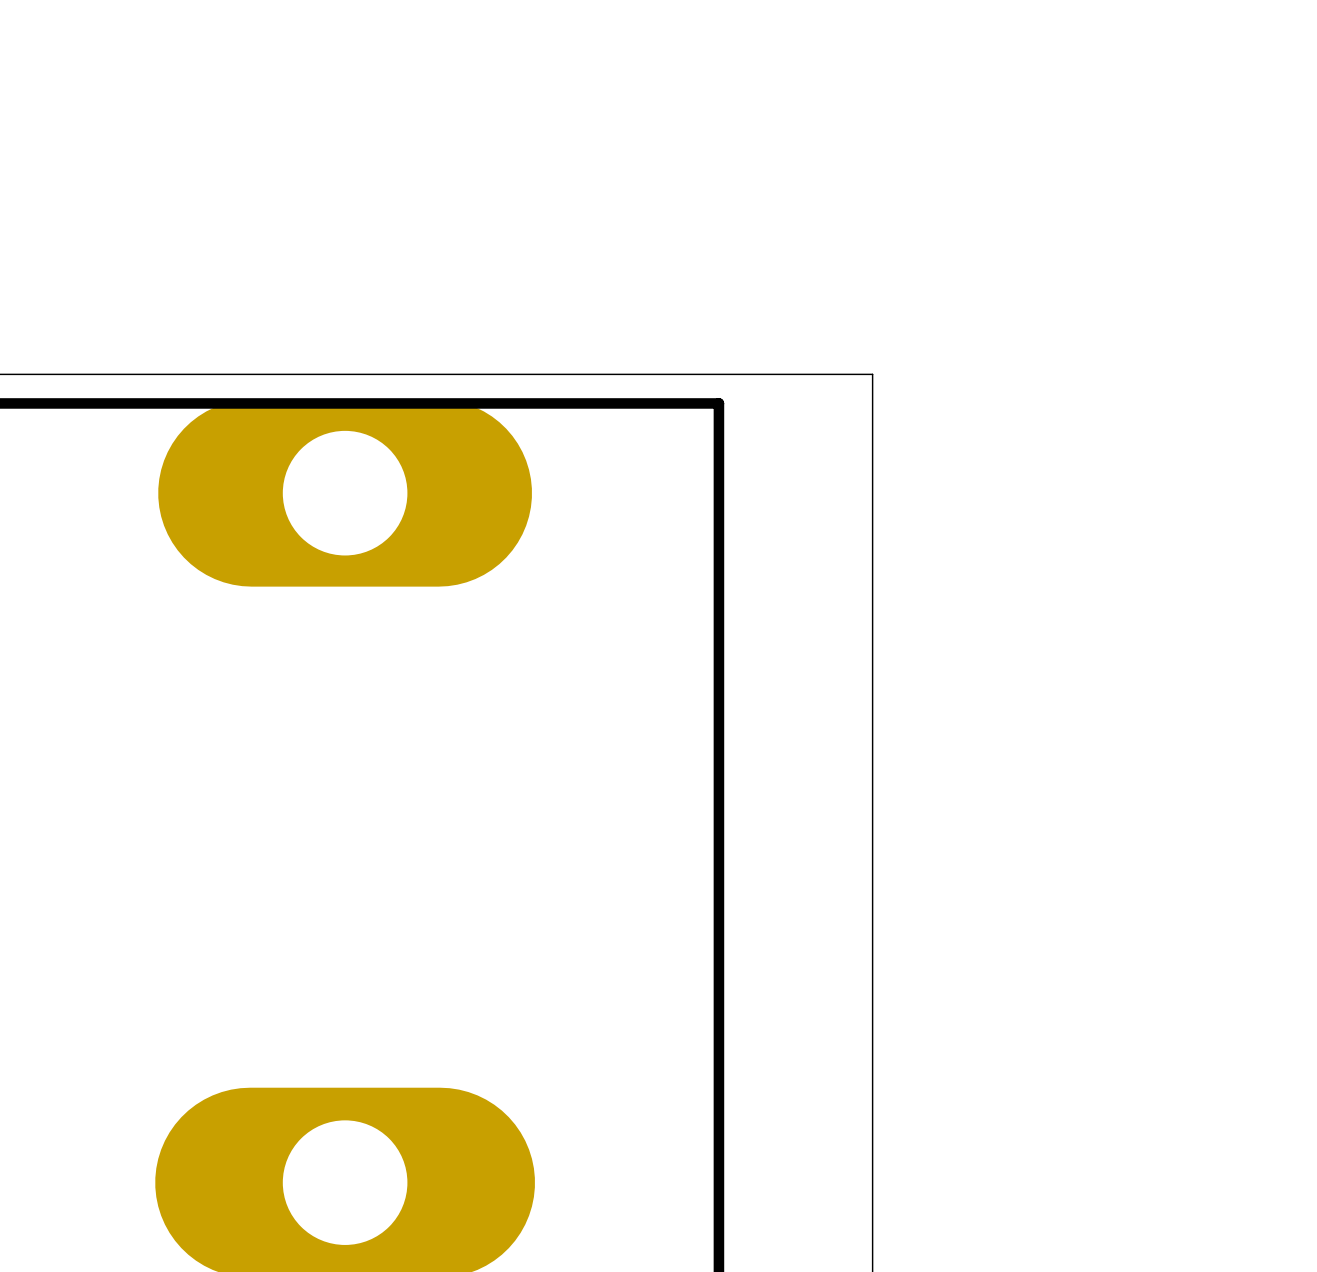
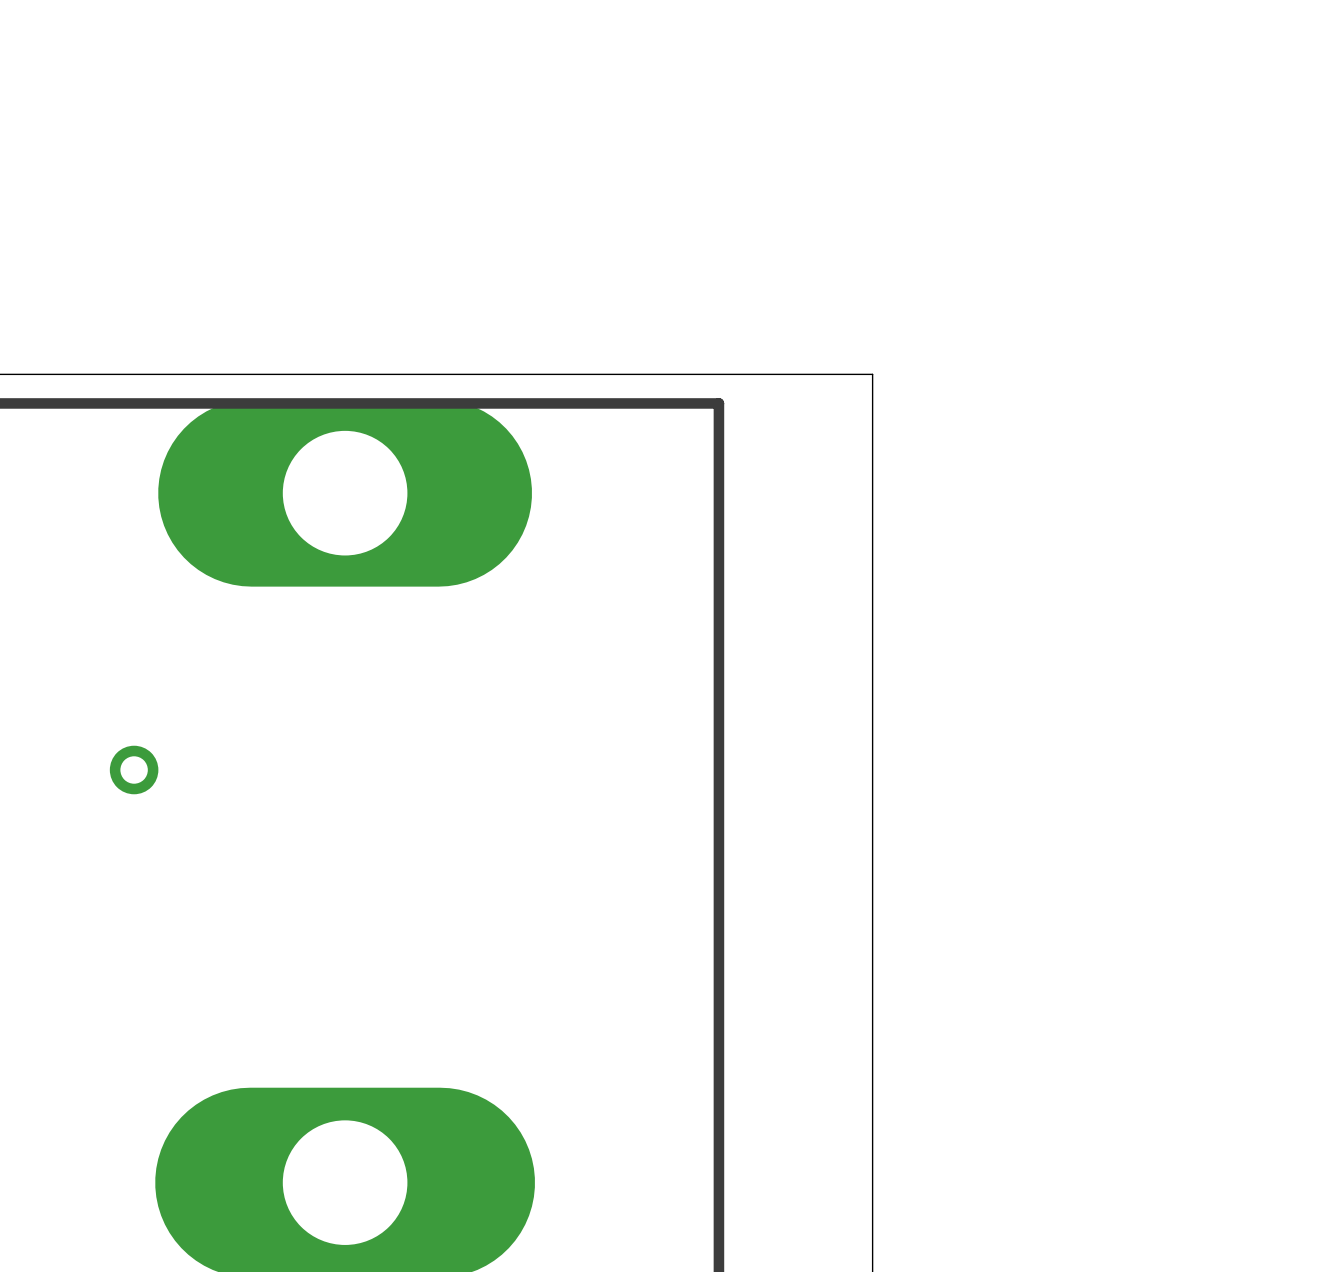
via: none -> (134, 770)

